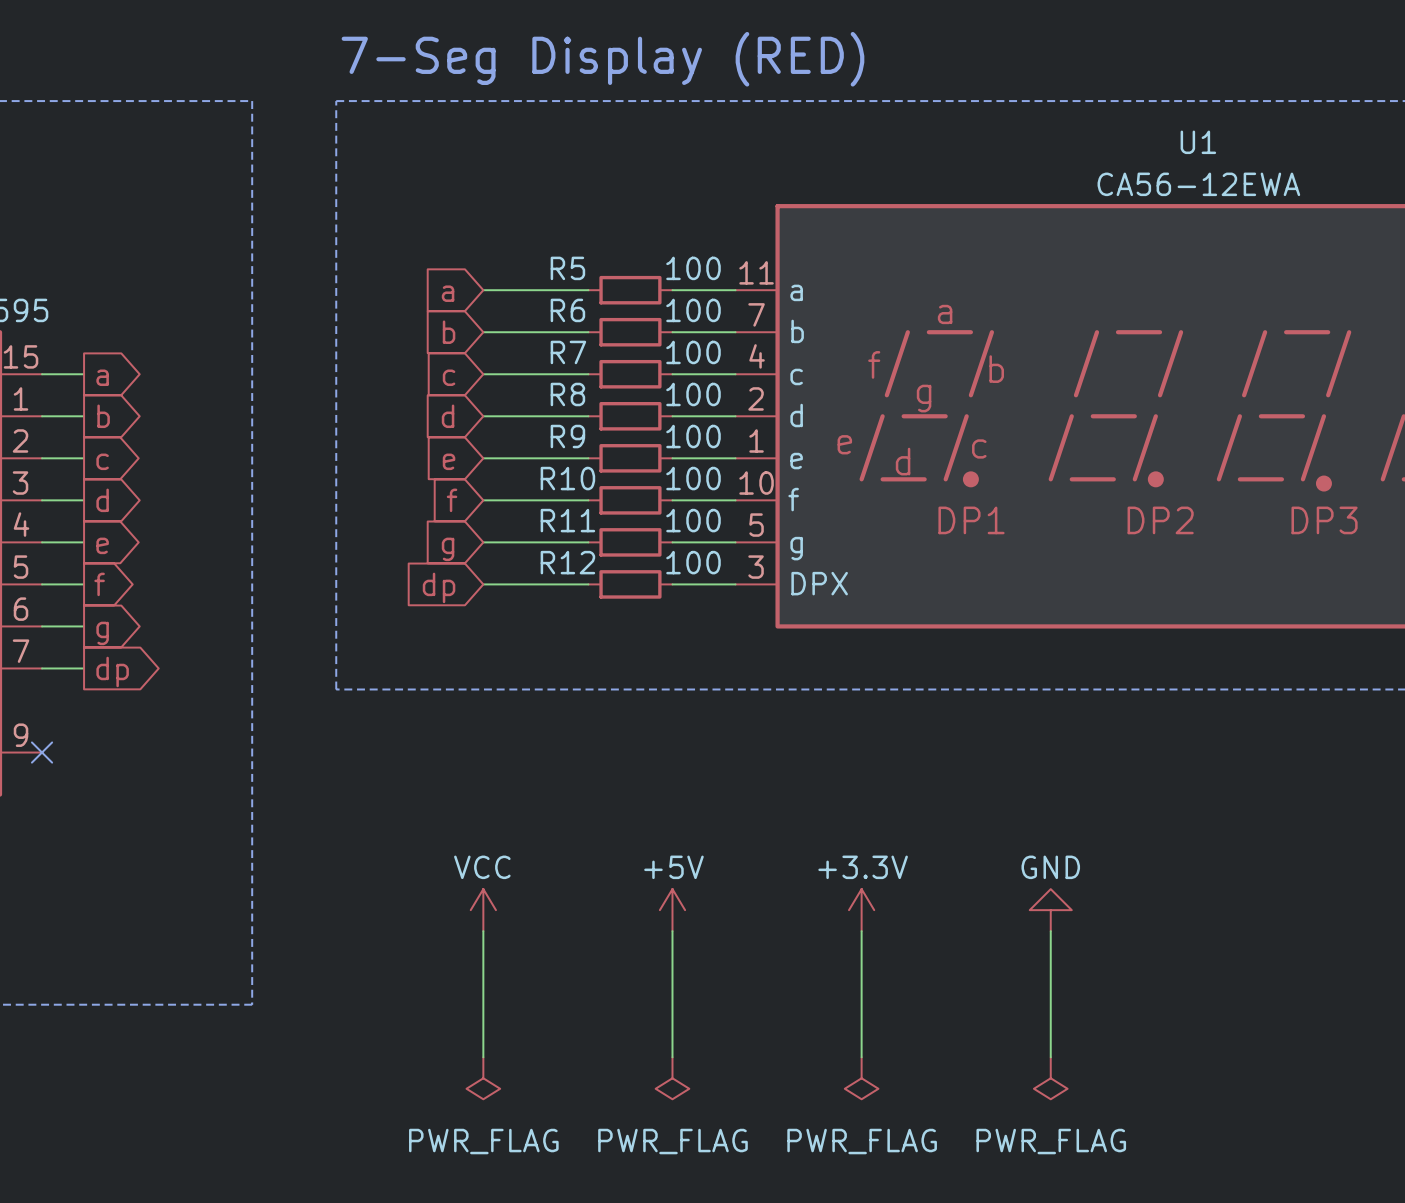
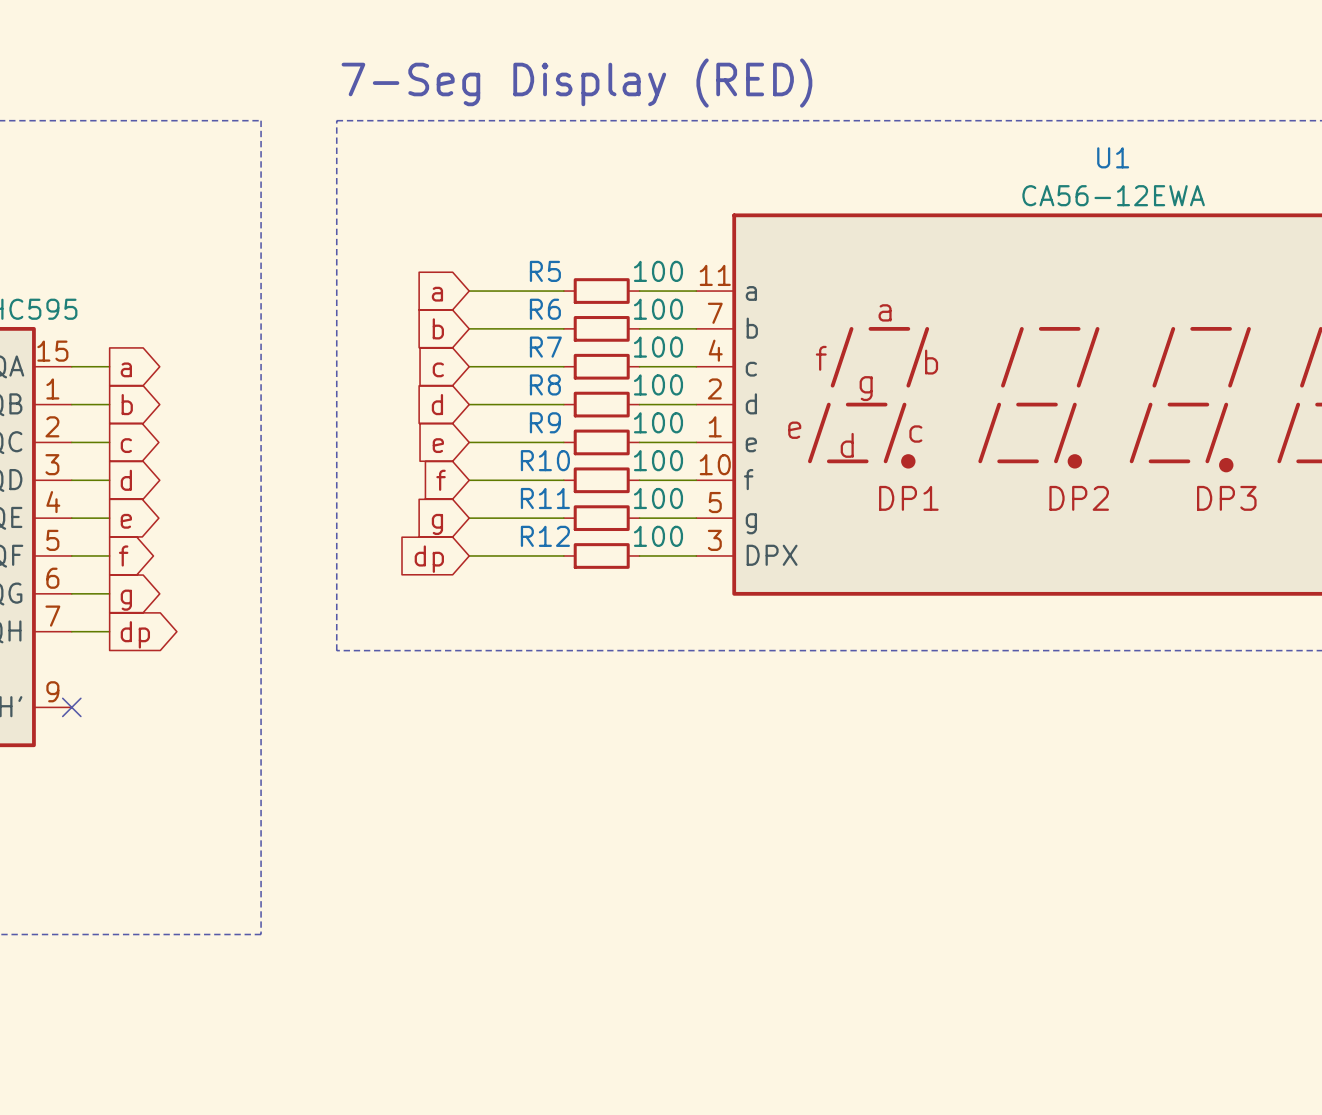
power symbol: VCC (483, 910) -> none
power symbol: +5V (672, 910) -> none
power symbol: +3.3V (861, 910) -> none
power symbol: GND (1050, 910) -> none
wire: (483, 931) (483, 1057) -> none
wire: (672, 931) (672, 1057) -> none
wire: (861, 931) (861, 1057) -> none
wire: (1050, 931) (1050, 1057) -> none
power symbol: PWR_FLAG (483, 1078) -> none
power symbol: PWR_FLAG (672, 1078) -> none
power symbol: PWR_FLAG (861, 1078) -> none
power symbol: PWR_FLAG (1050, 1078) -> none

